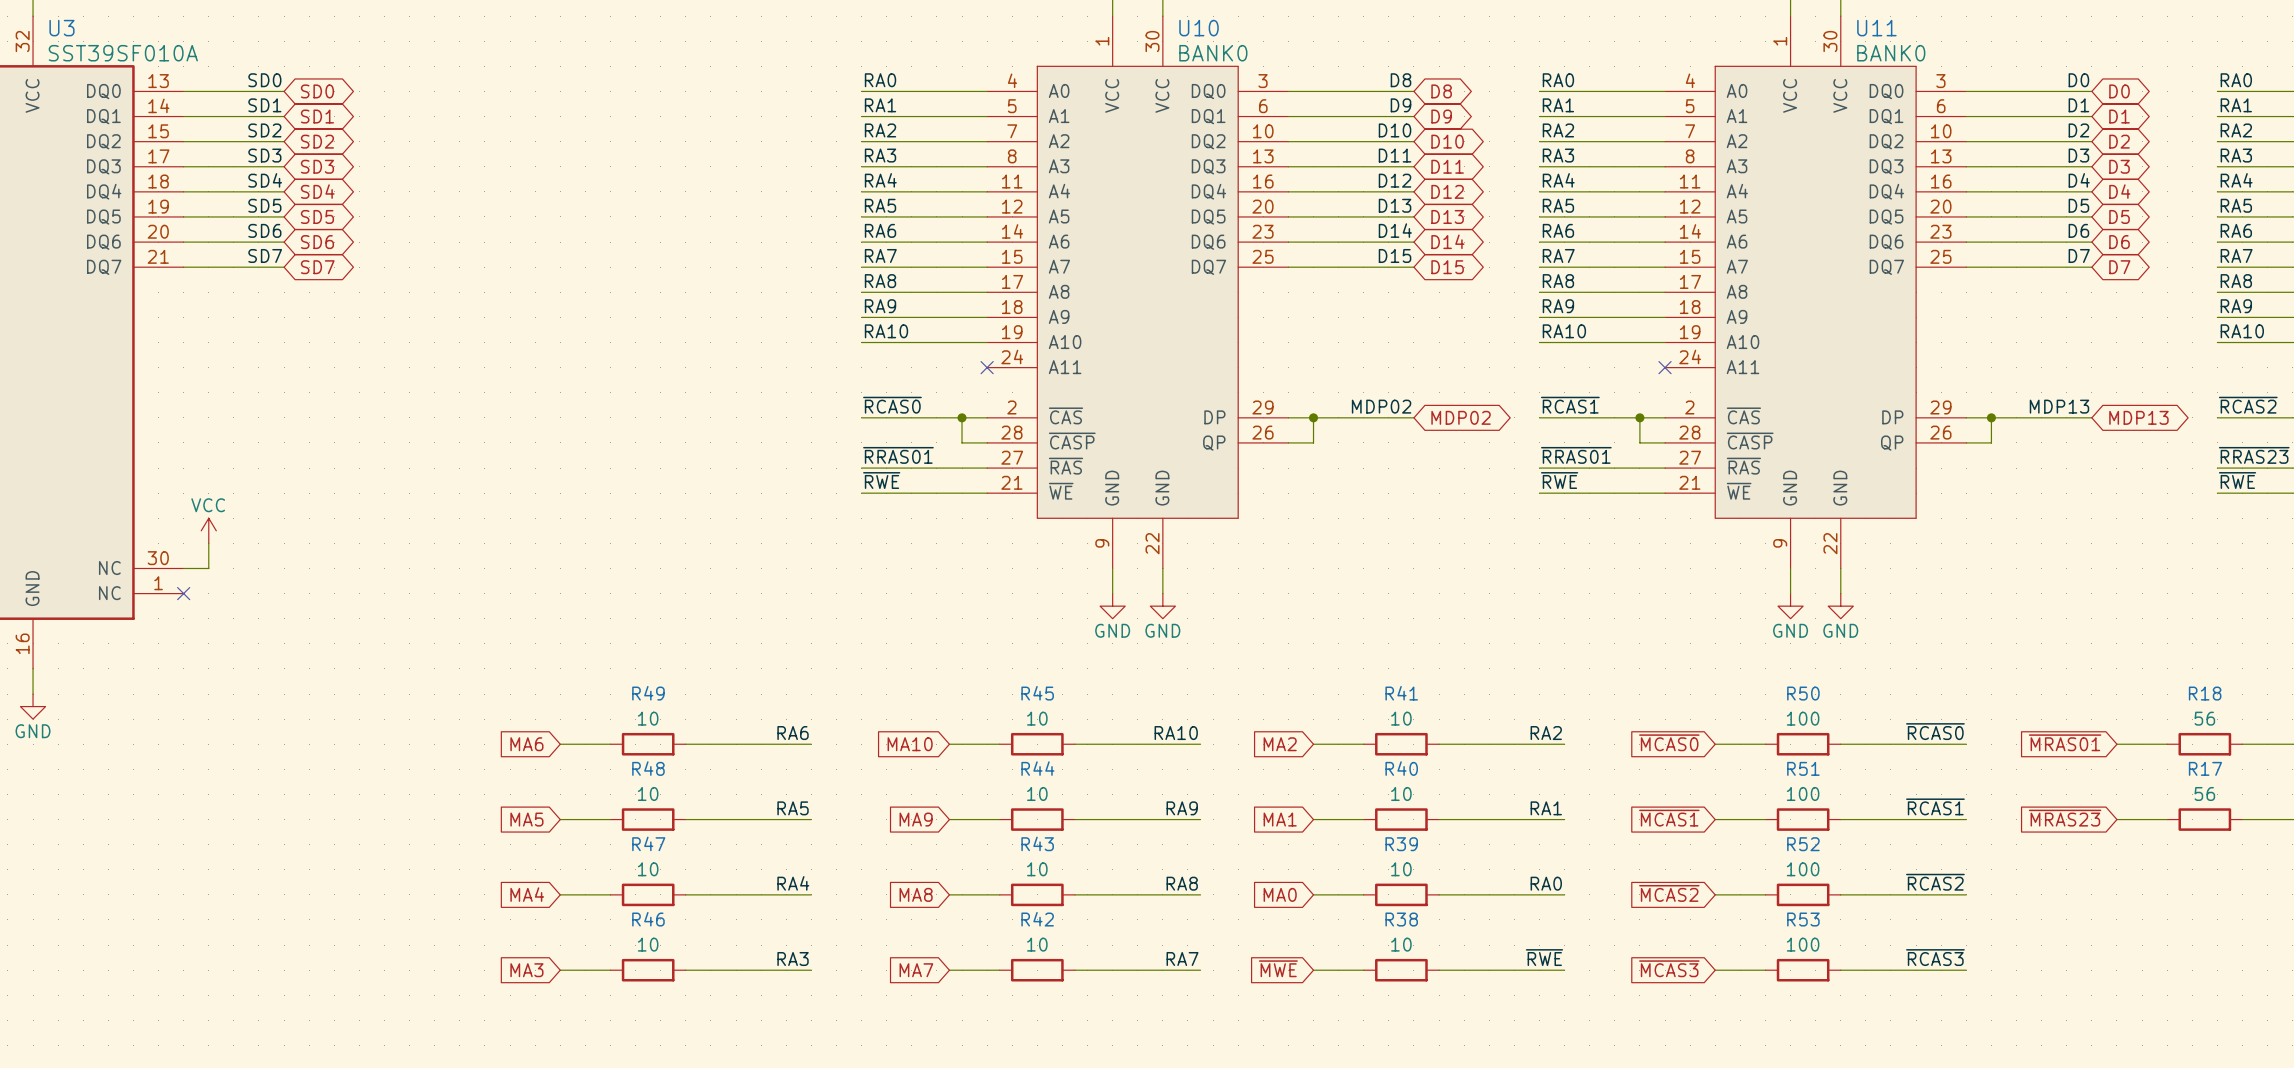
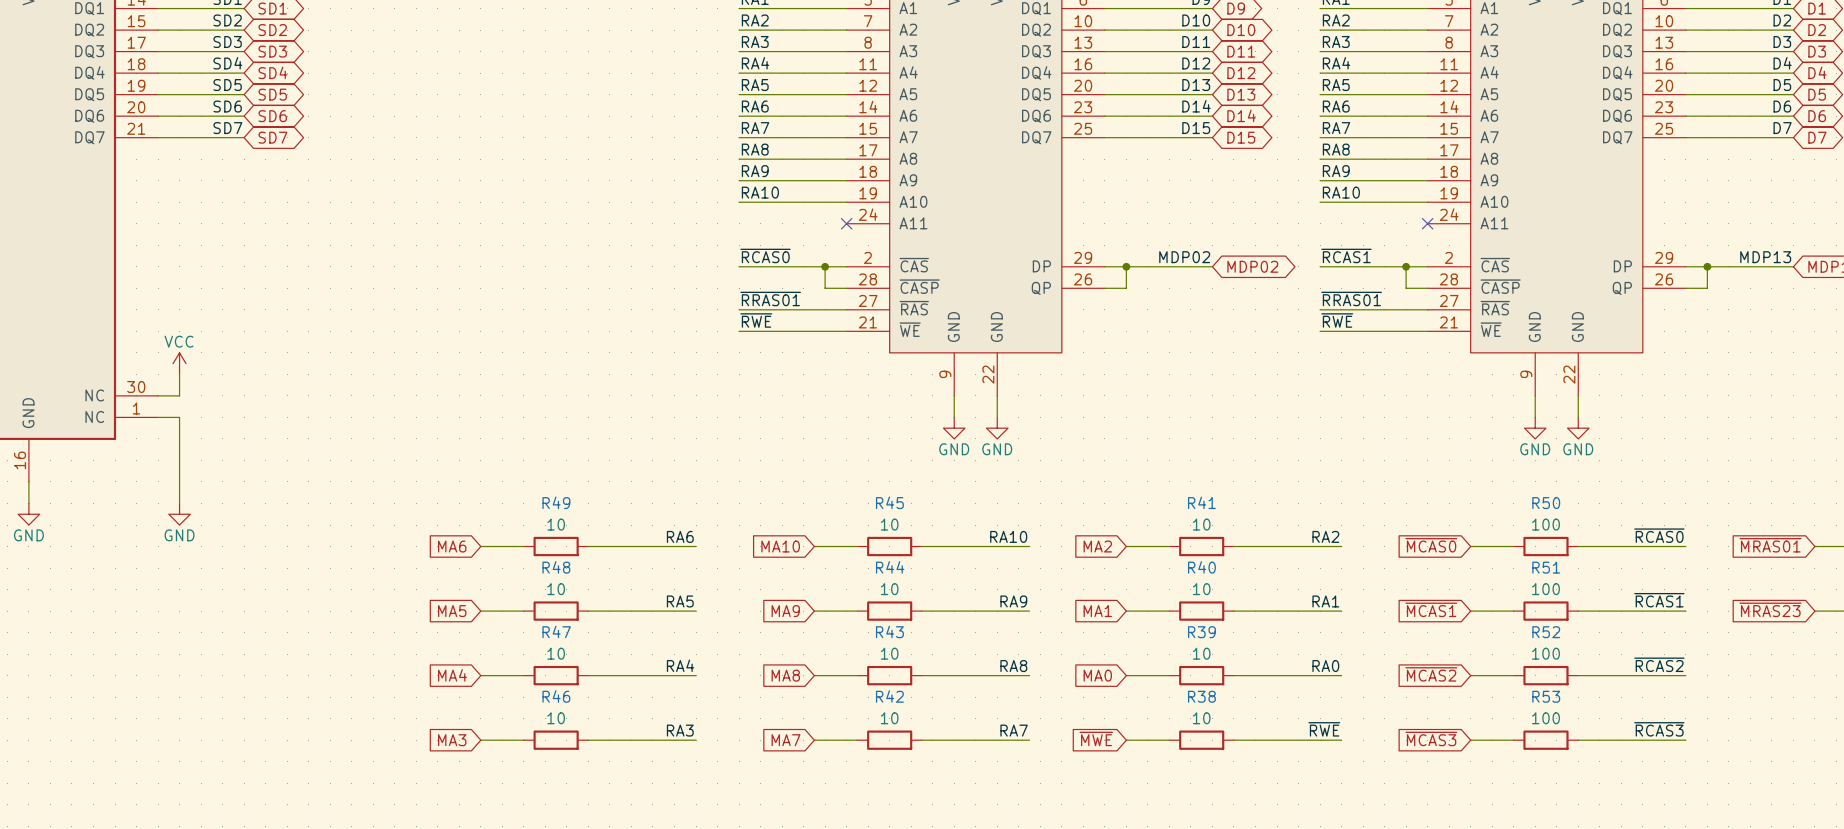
wire: none -> (158, 417) (179, 417) (179, 503)
no-connect mark: (183, 593) -> none
power symbol: none -> GND (179, 514)

